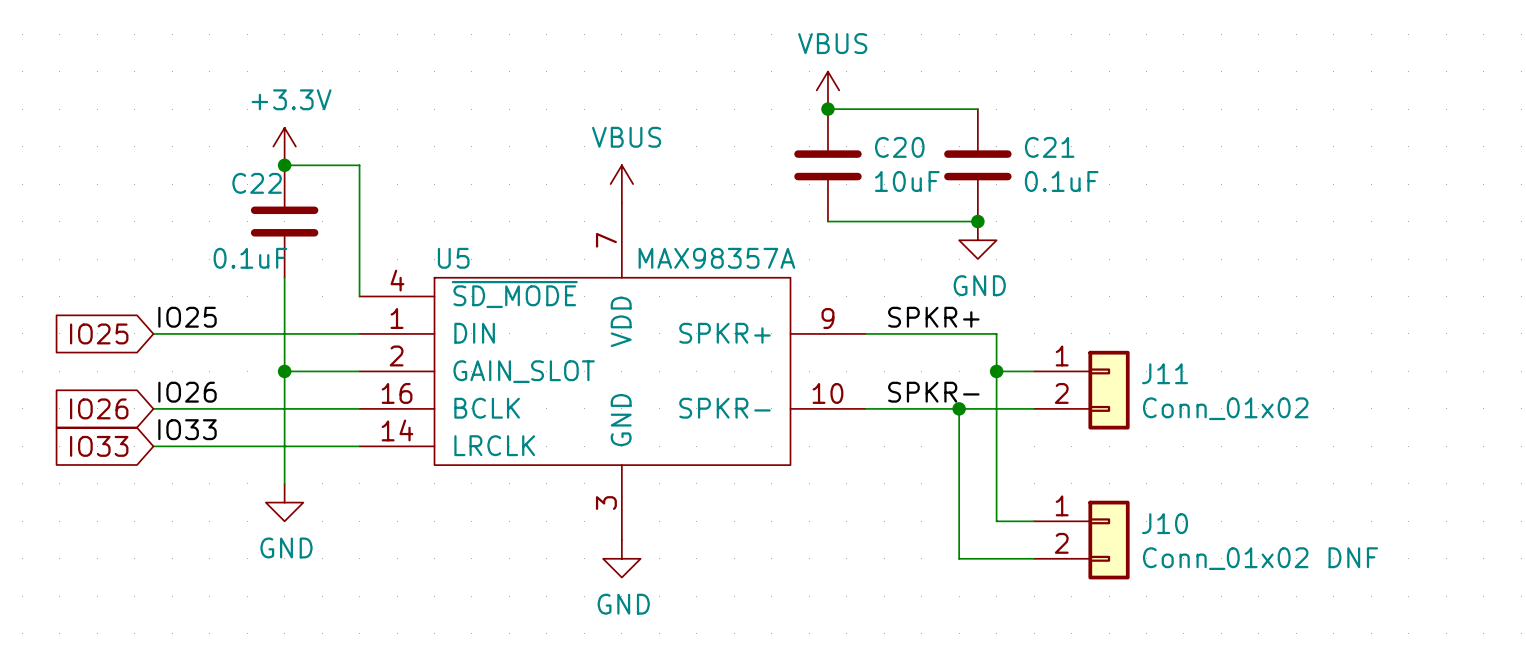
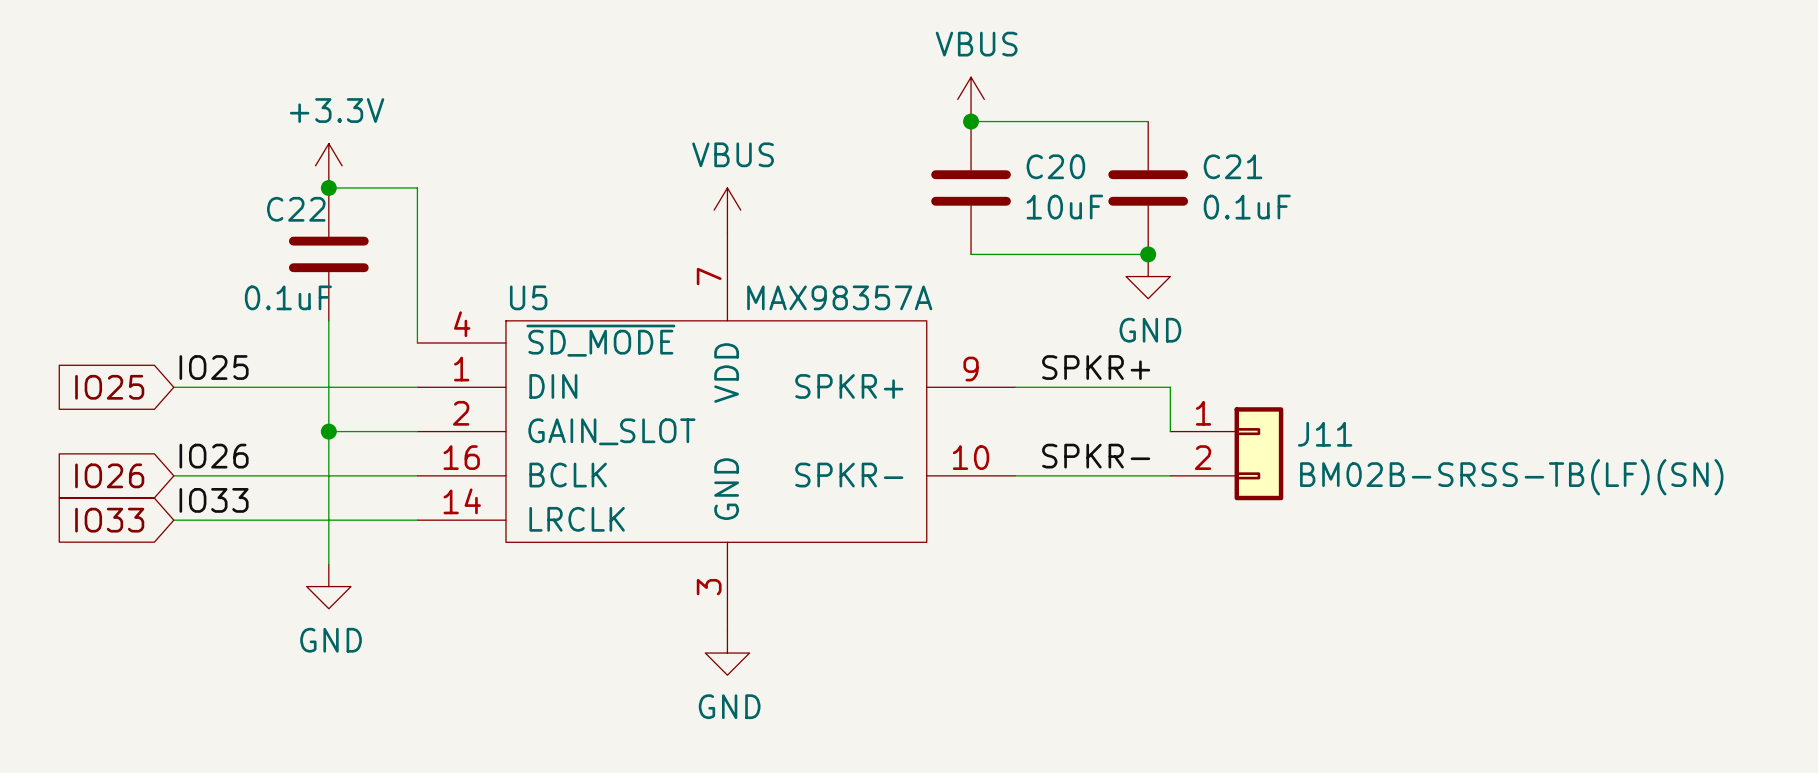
junction: (996, 371) -> none
wire: (1034, 371) (996, 371) (996, 521) (1034, 521) -> none
J11 position: (1081, 390) -> (1226, 453)
wire: (959, 408) (959, 558) (1034, 558) -> none
junction: (959, 408) -> none
J11 value: Conn_01x02 (1225, 408) -> BM02B-SRSS-TB(LF)(SN) (1511, 477)
J10: Conn_01x02 DNF (1081, 540) -> none

